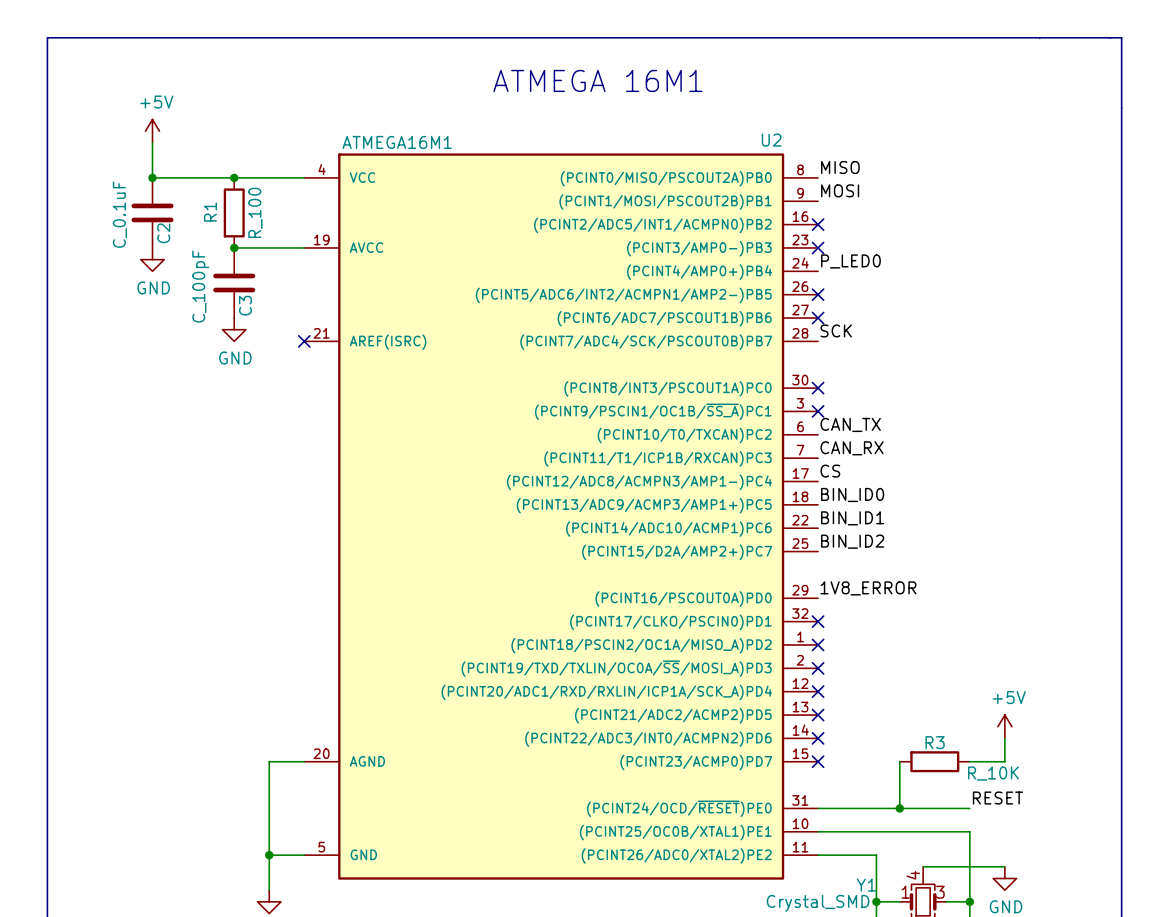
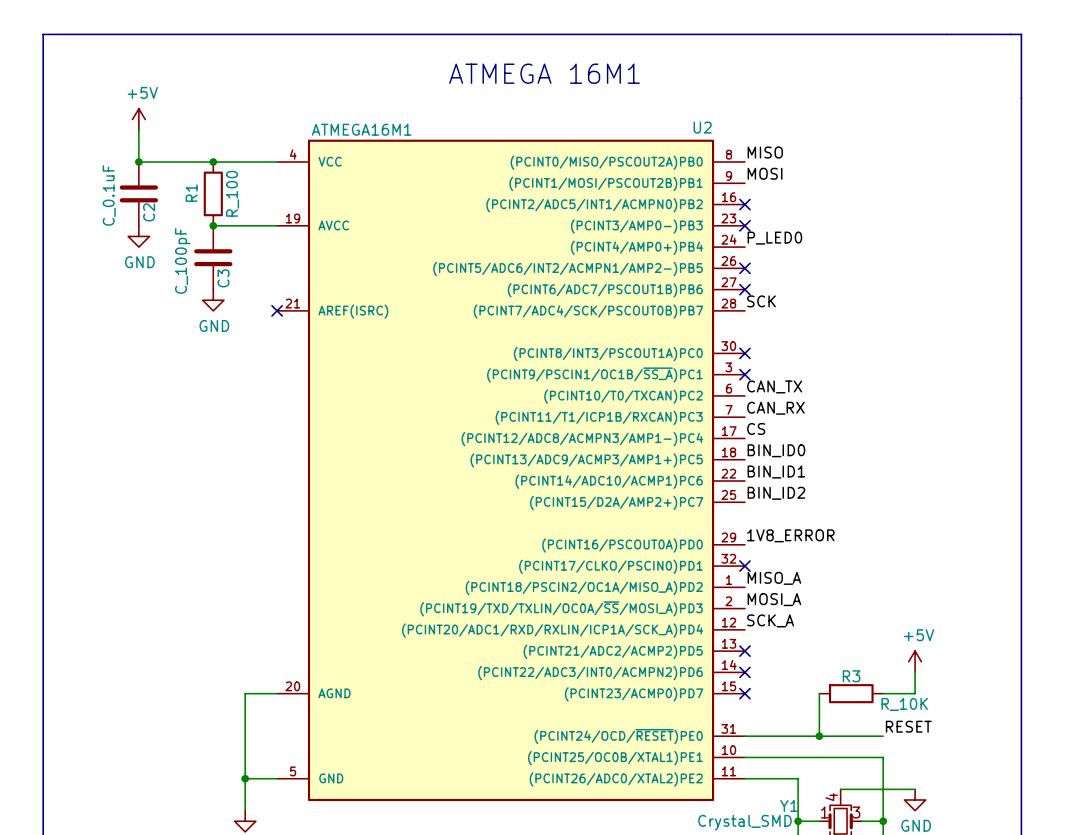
label: none -> MISO_A (774, 578)
no-connect mark: (818, 644) -> none
label: none -> MOSI_A (774, 599)
no-connect mark: (818, 668) -> none
label: none -> SCK_A (770, 620)
no-connect mark: (818, 691) -> none

